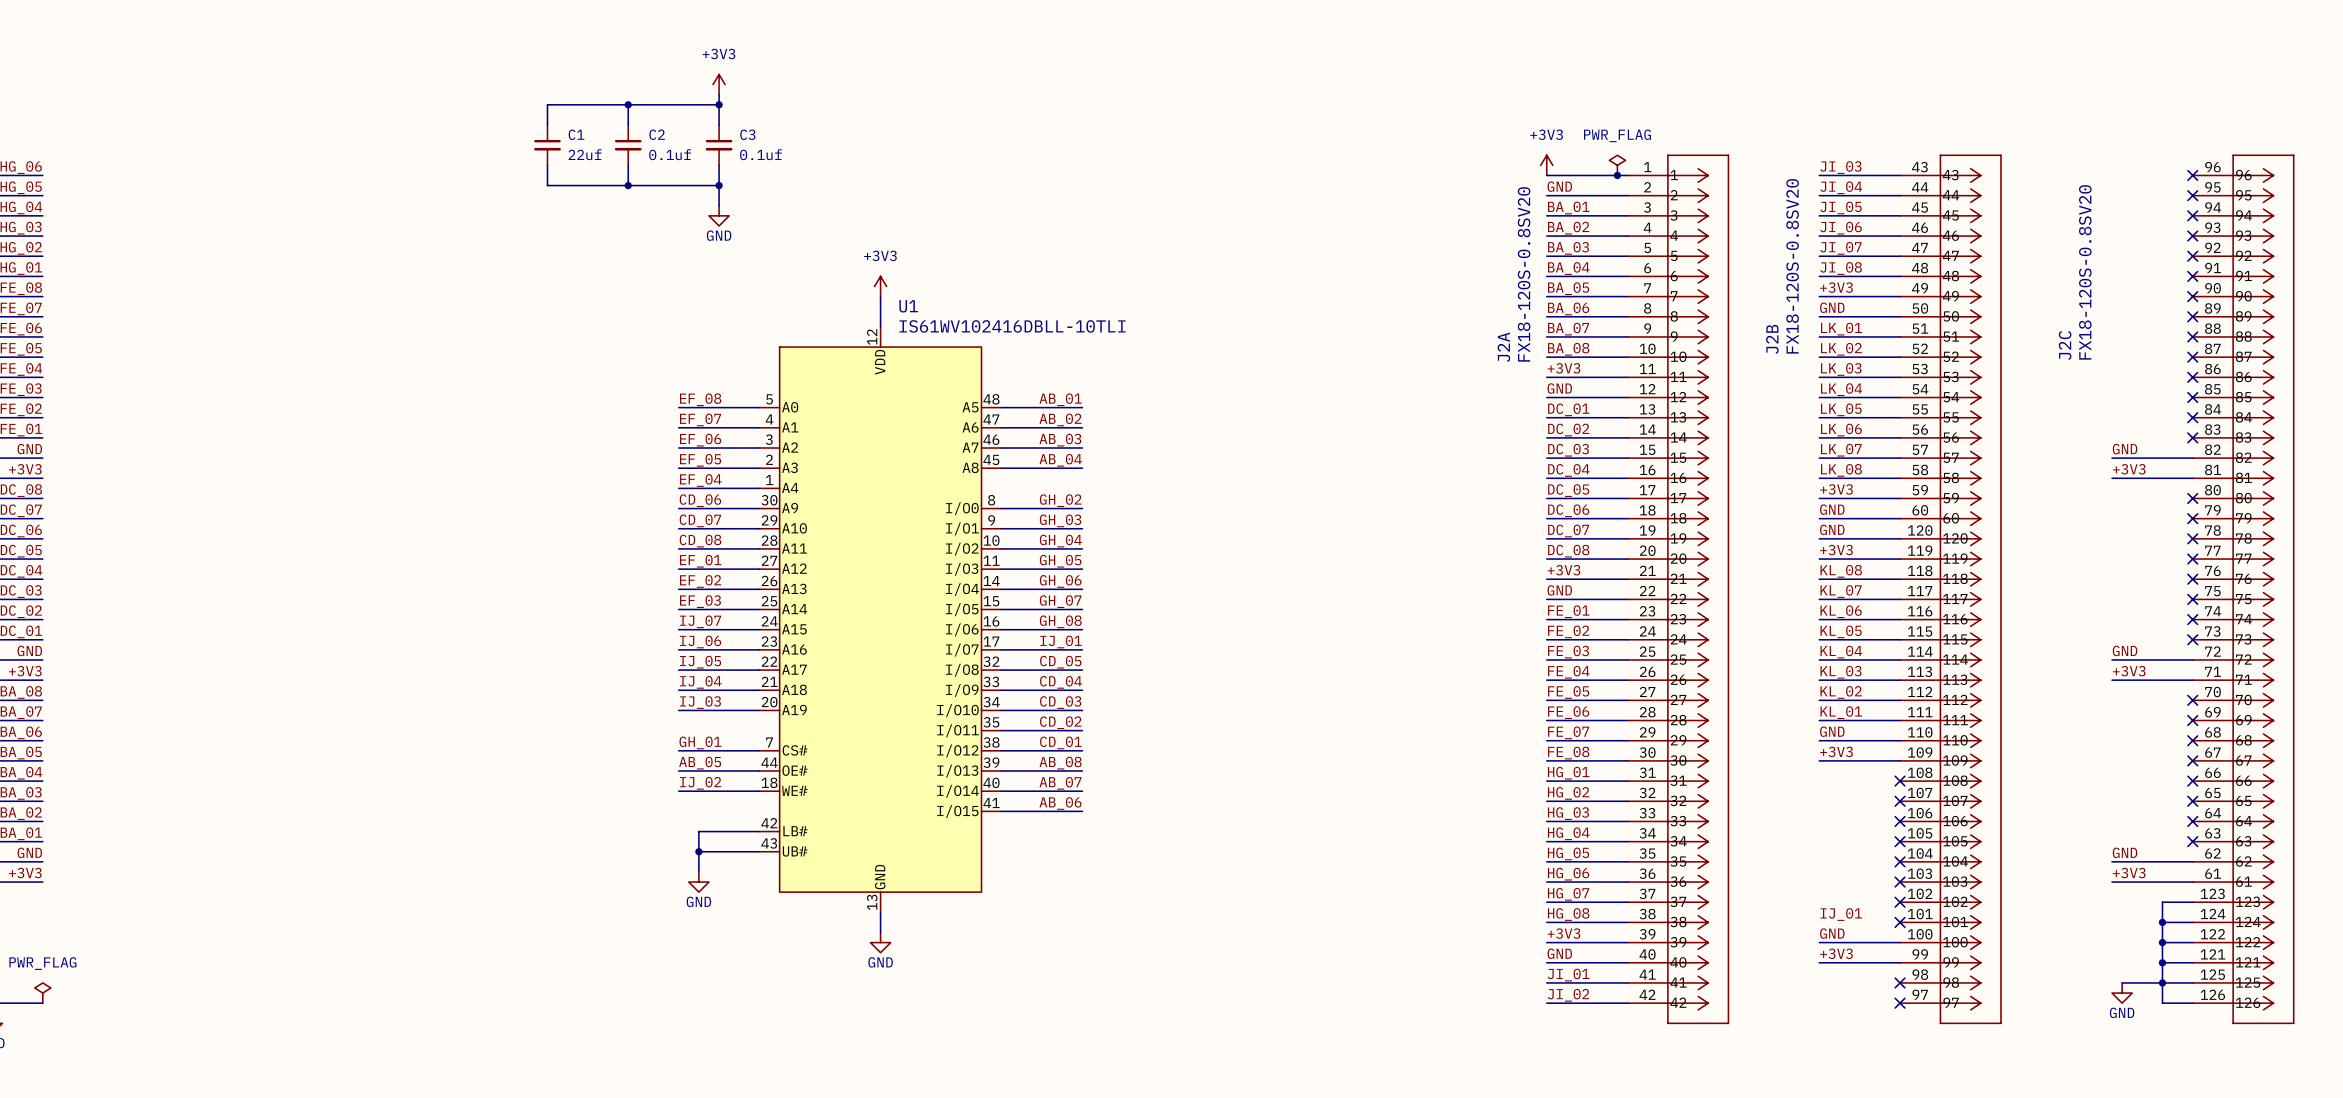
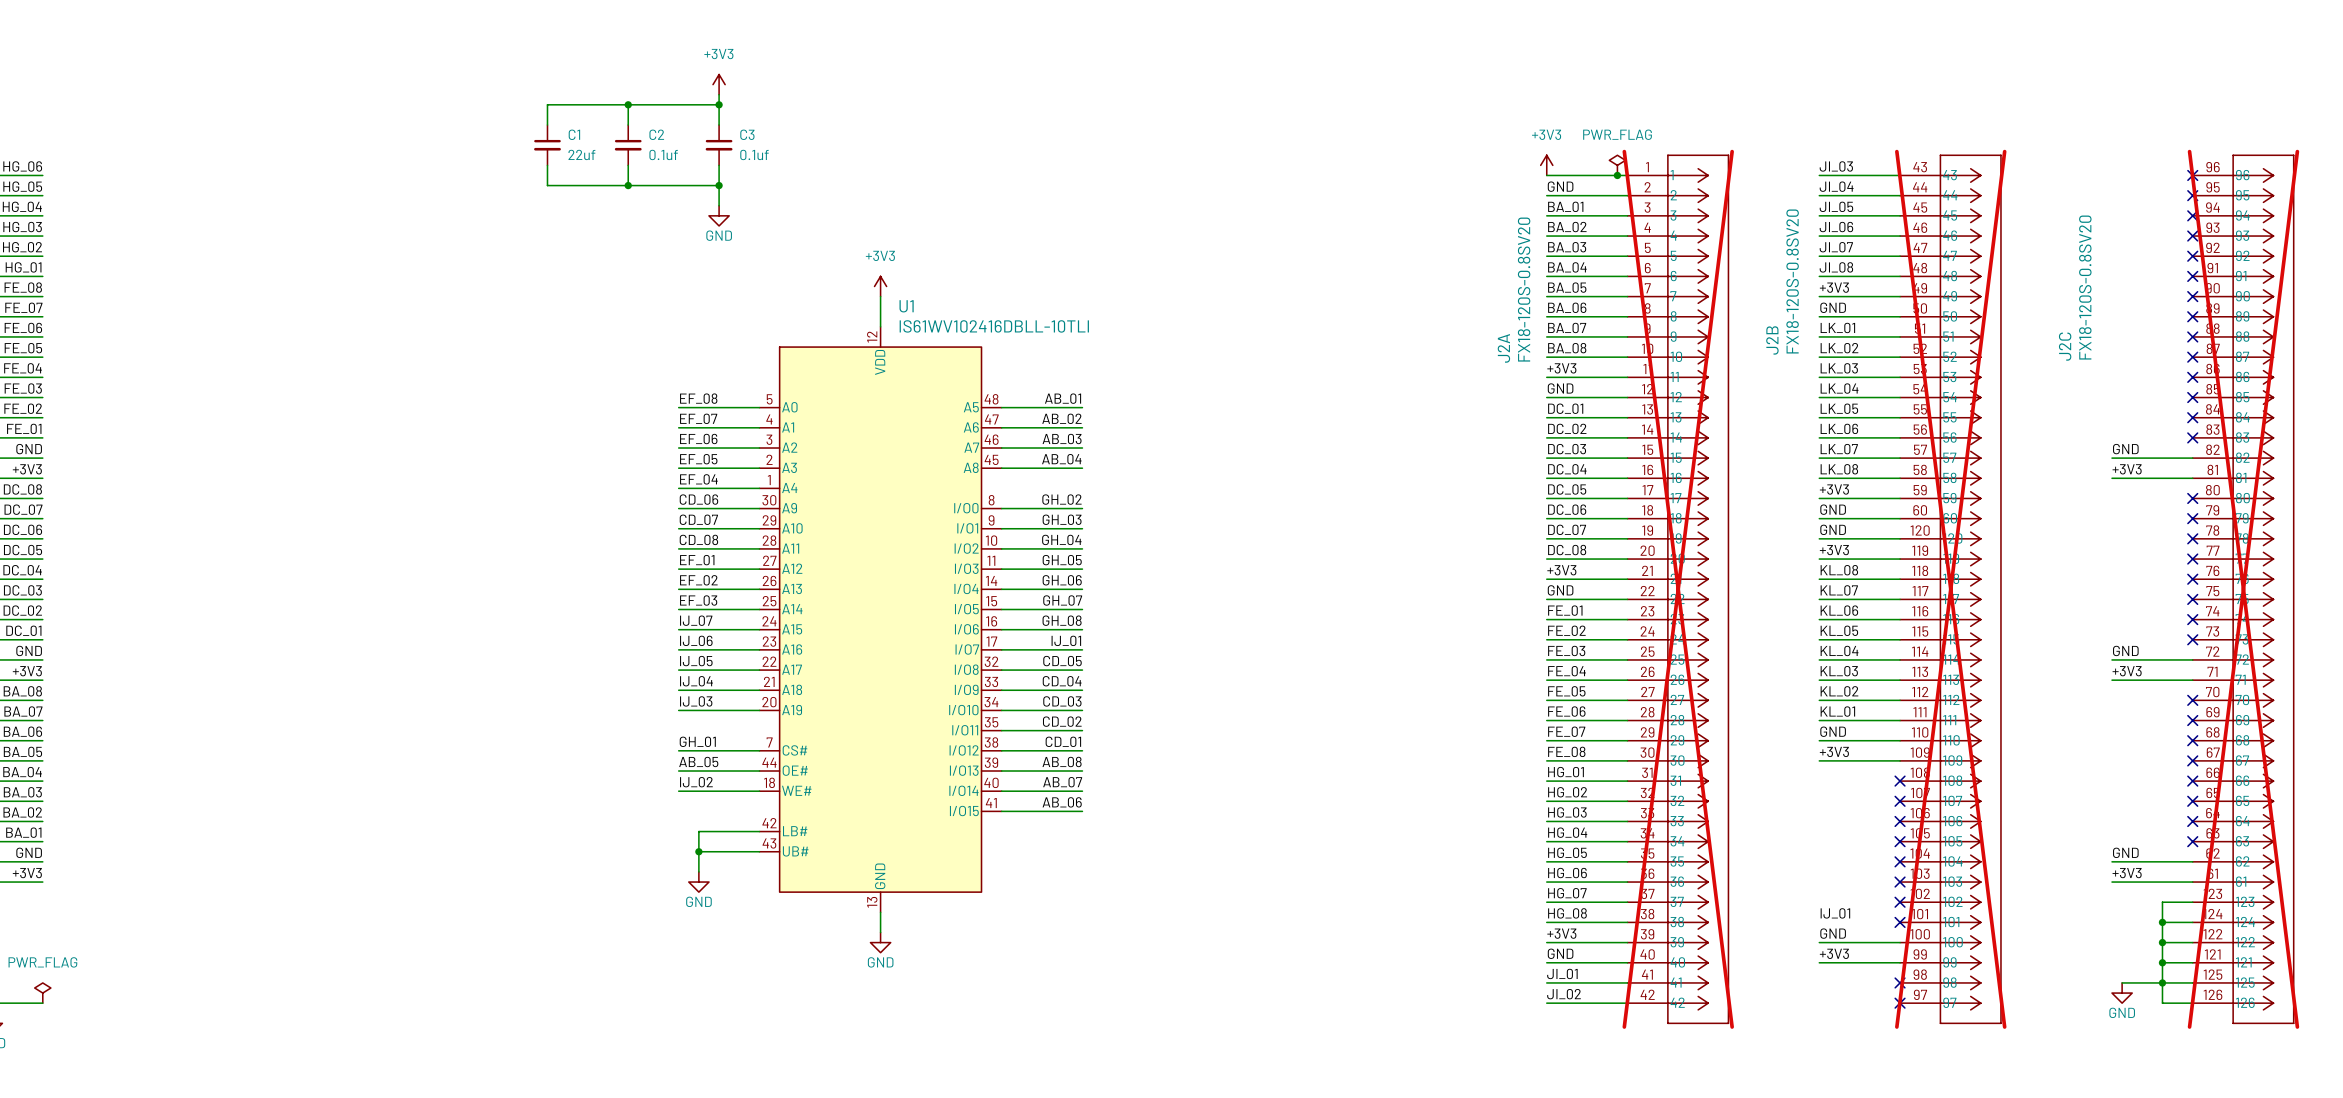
J2A do-not-place cross: none -> (1678, 589)
J2B do-not-place cross: none -> (1950, 589)
J2C do-not-place cross: none -> (2243, 589)

